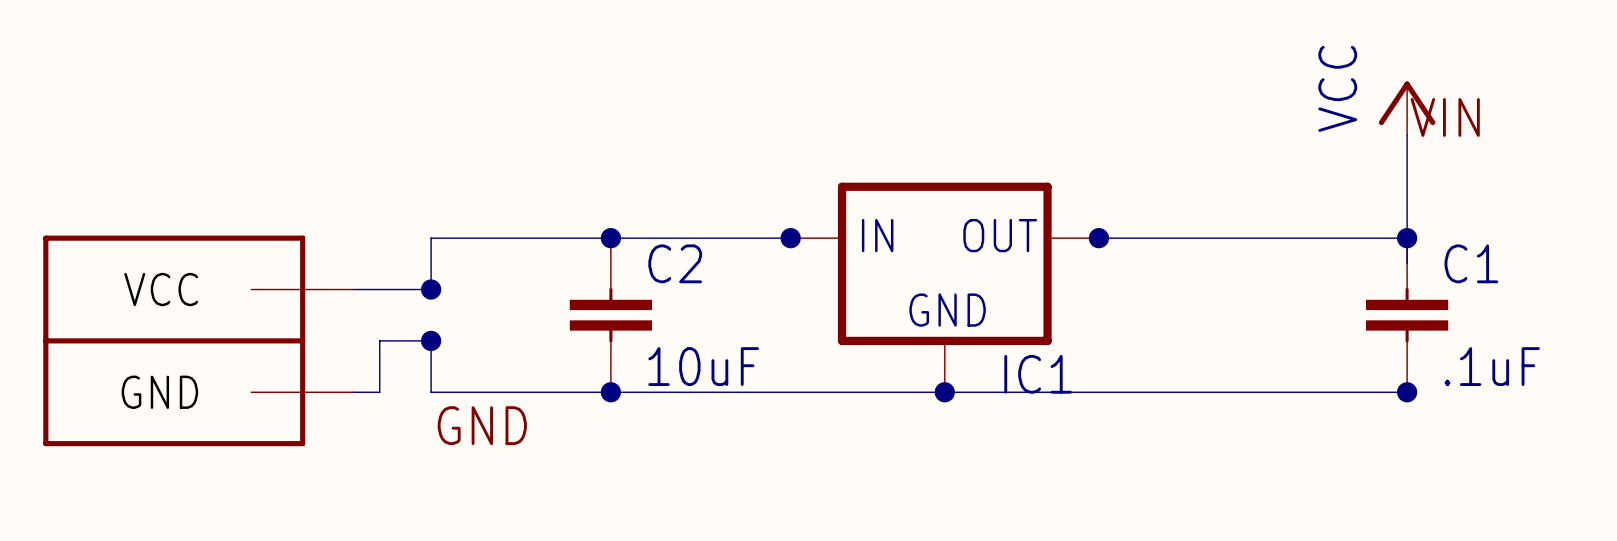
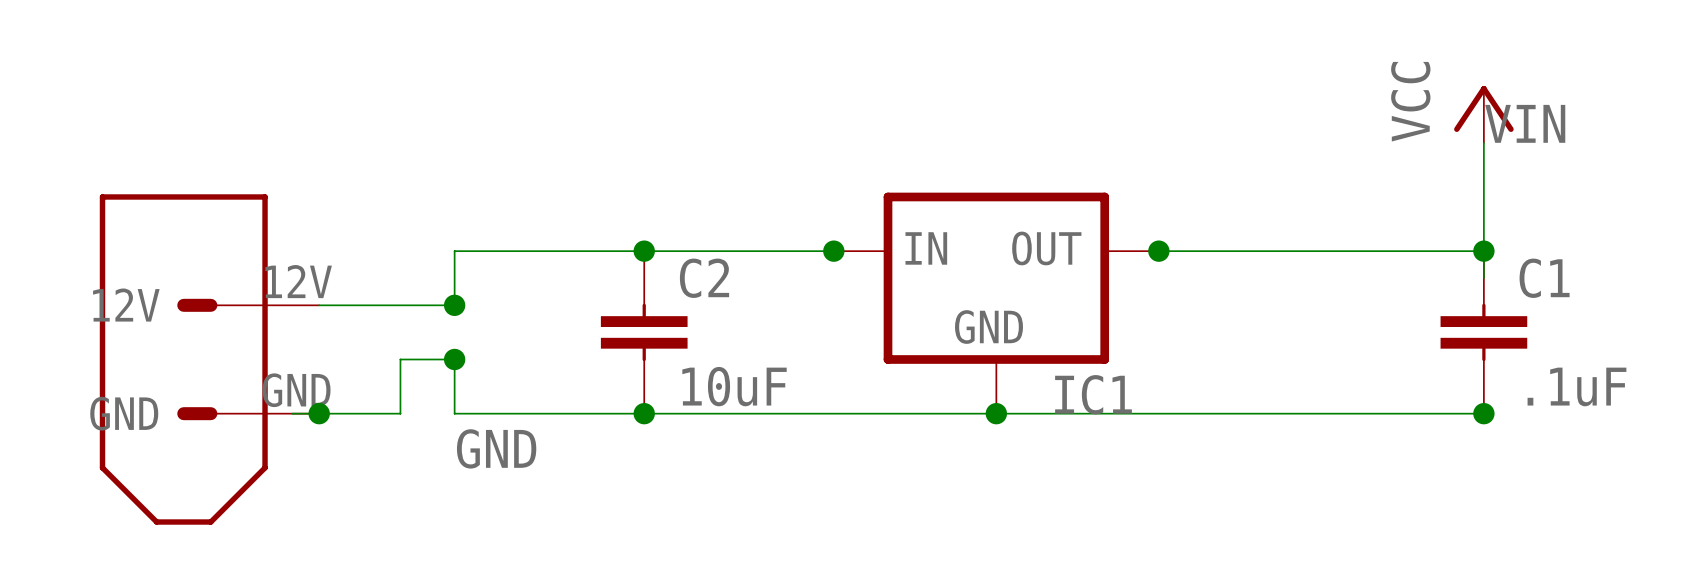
part symbol: [43, 235, 355, 447] -> [99, 194, 320, 525]
junction: none -> (319, 413)

